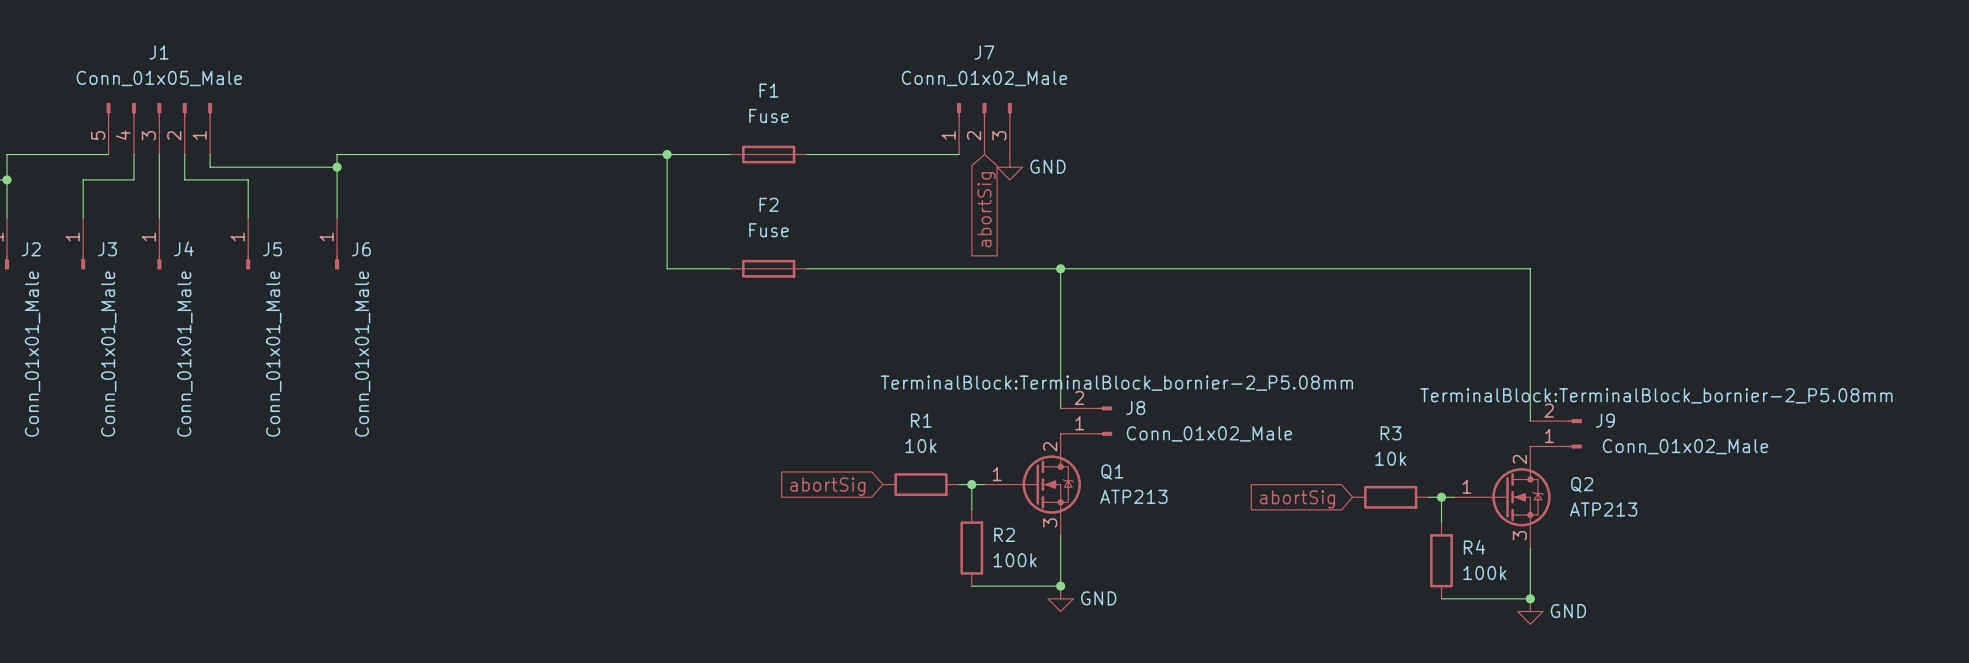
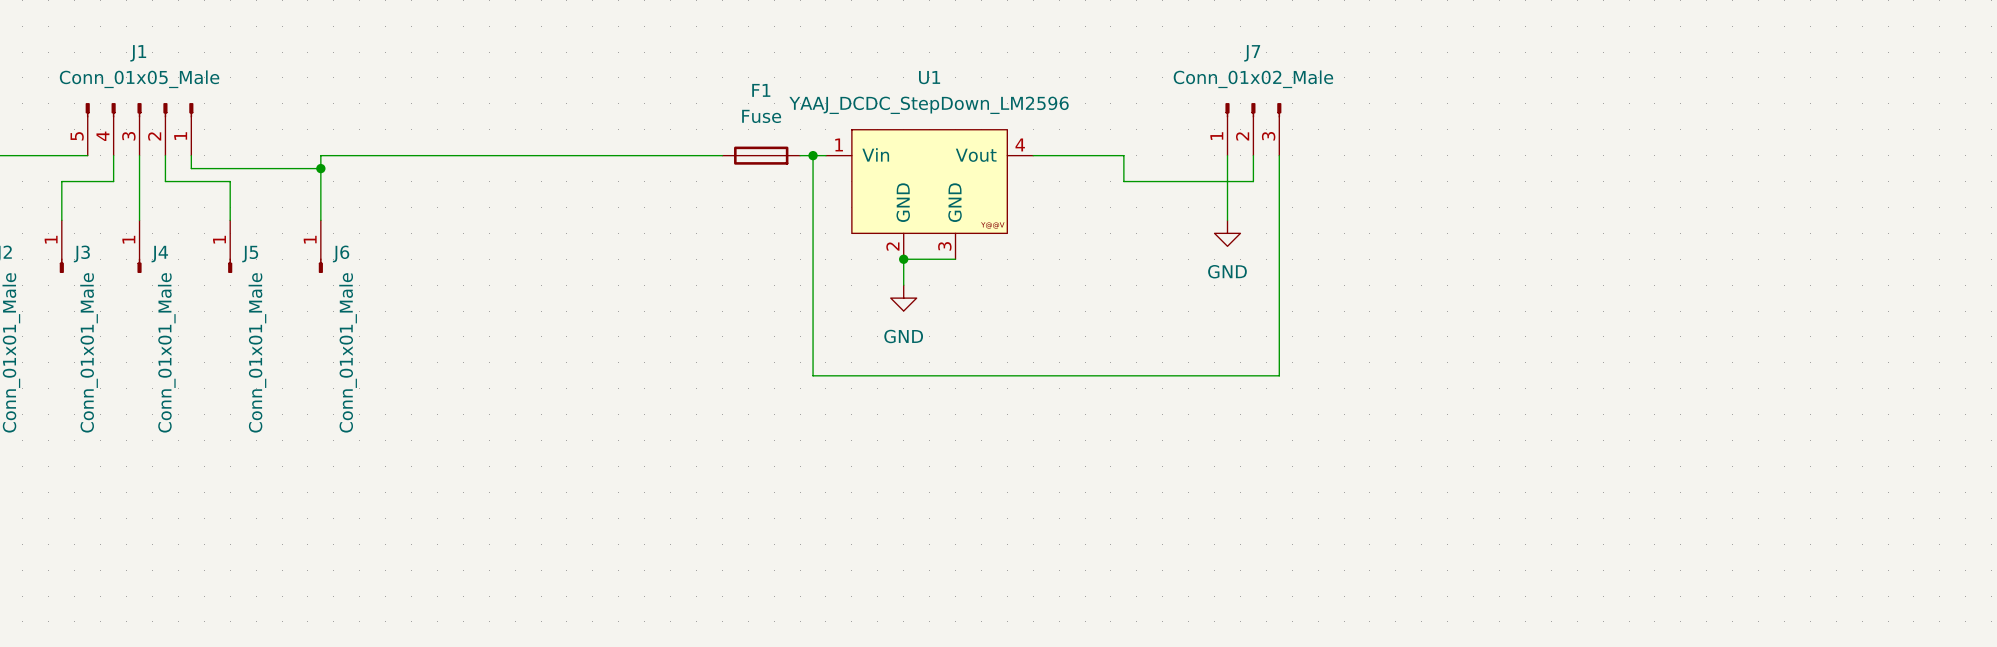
J7 position: (984, 128) -> (1253, 129)
wire: (667, 154) (667, 268) (730, 268) -> none
junction: (667, 154) -> none
wire: none -> (813, 155) (813, 375) (1279, 375) (1279, 155)
junction: none -> (813, 155)
wire: none -> (1033, 155) (1123, 155) (1123, 181) (1253, 181) (1253, 155)
wire: none -> (1227, 155) (1227, 220)
power symbol: GND (1009, 167) -> none
U1: none -> YAAJ_DCDC_StepDown_LM2596 (929, 194)
global label: abortSig (986, 209) -> none
power symbol: none -> GND (1227, 233)
junction: none -> (903, 259)
wire: none -> (955, 259) (903, 259) (903, 285)
F2: Fuse (768, 268) -> none
wire: (806, 268) (1530, 268) (1530, 421) -> none
wire: (1060, 268) (1060, 408) -> none
junction: (1060, 268) -> none
power symbol: none -> GND (903, 298)
J8: Conn_01x02_Male (1086, 421) -> none
J9: Conn_01x02_Male (1556, 433) -> none
R1: 10k (921, 484) -> none
wire: (959, 484) (984, 484) -> none
wire: (971, 484) (971, 509) -> none
junction: (971, 484) -> none
Q1: ATP213 (1032, 484) -> none
global label: abortSig (827, 486) -> none
R3: 10k (1390, 497) -> none
wire: (1428, 497) (1454, 497) -> none
wire: (1441, 497) (1441, 522) -> none
junction: (1441, 497) -> none
Q2: ATP213 (1502, 497) -> none
global label: abortSig (1297, 499) -> none
wire: (1060, 535) (1060, 586) (971, 586) -> none
R2: 100k (971, 548) -> none
wire: (1530, 548) (1530, 598) (1441, 598) -> none
R4: 100k (1441, 560) -> none
junction: (1060, 586) -> none
power symbol: GND (1060, 598) -> none
junction: (1530, 598) -> none
power symbol: GND (1530, 611) -> none

